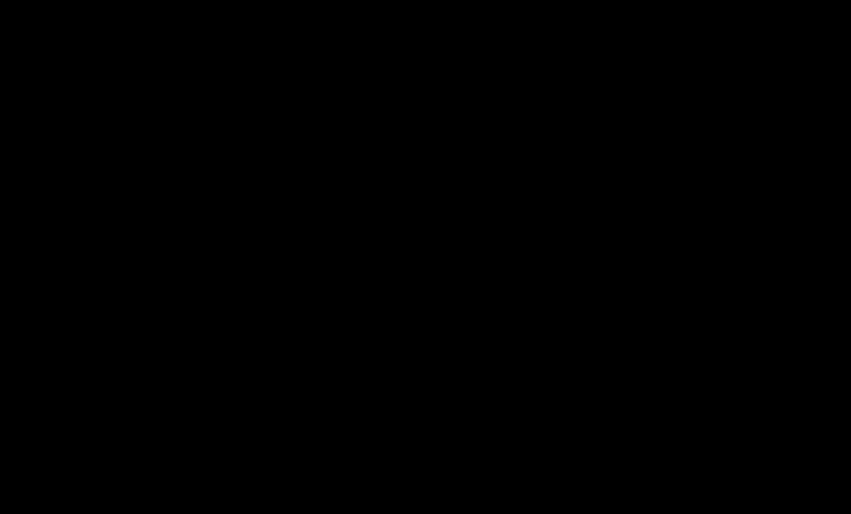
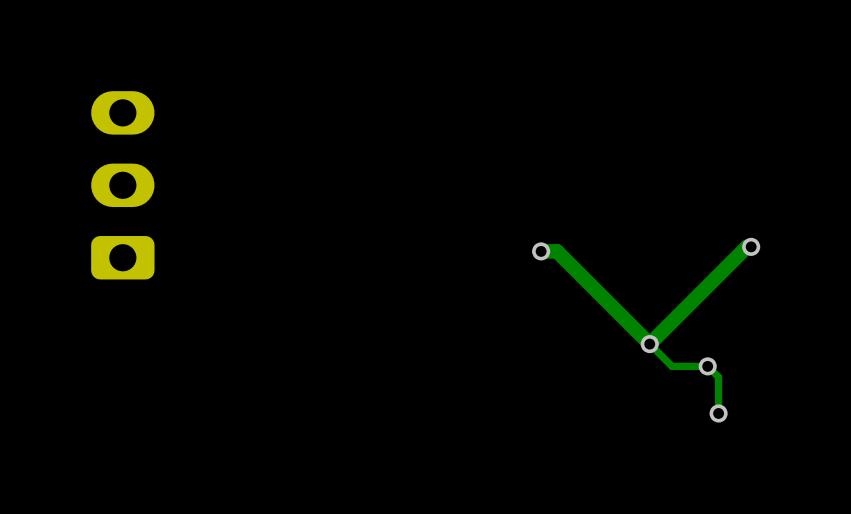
part: none -> (122, 185)
track: none -> (751, 246) (746, 246) (649, 344)
via: none -> (751, 246)
track: none -> (541, 251) (557, 251) (649, 344)
via: none -> (541, 251)
track: none -> (649, 344) (672, 366) (707, 366) (718, 377) (718, 413)
via: none -> (649, 344)
via: none -> (707, 366)
via: none -> (718, 413)

